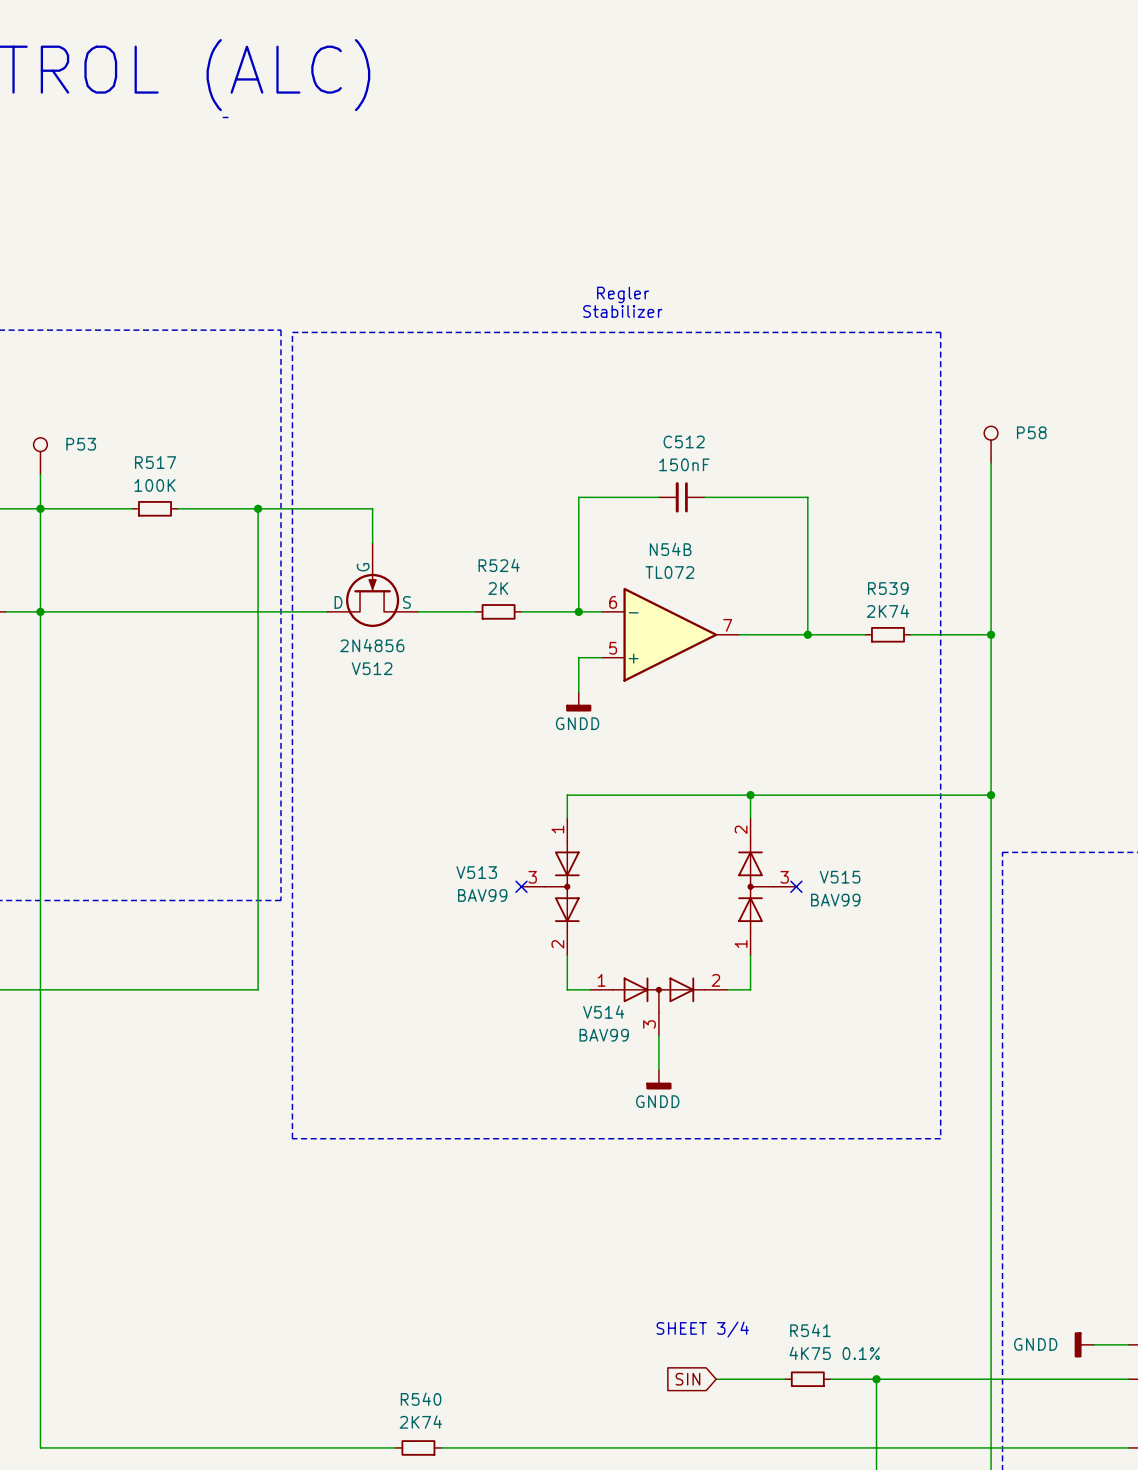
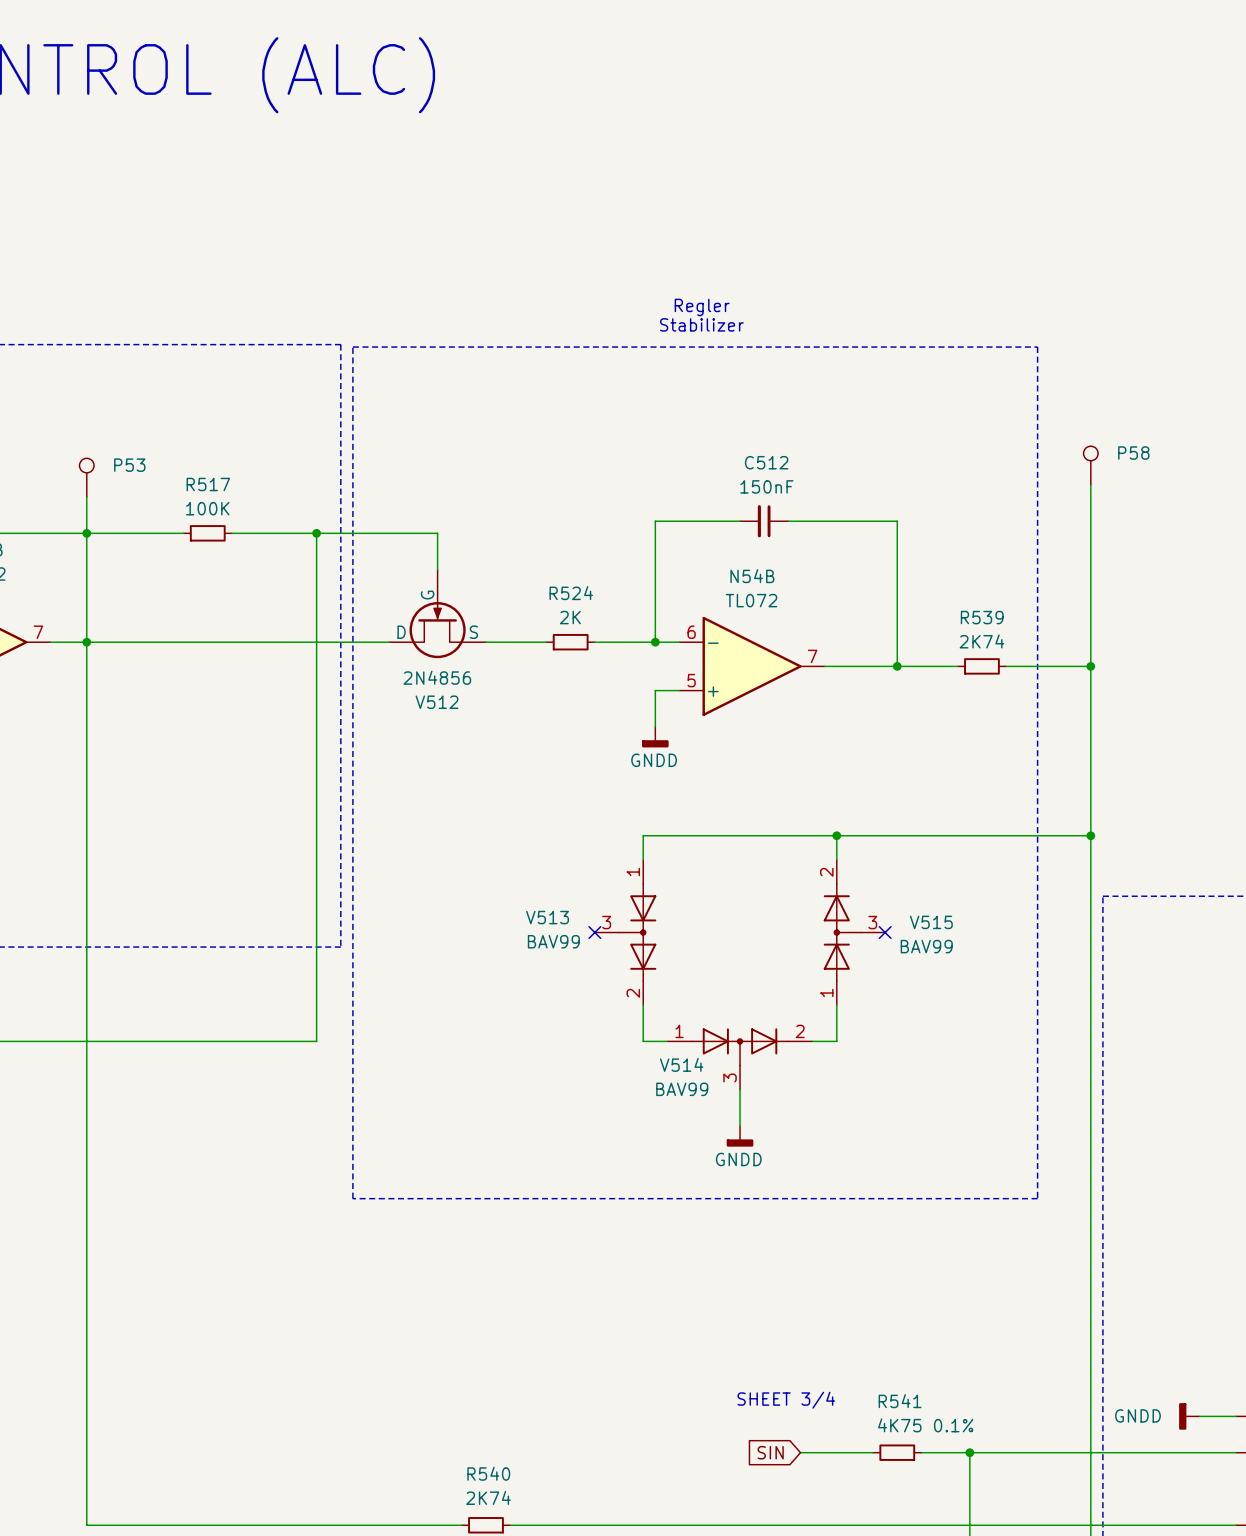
line: (223, 117) (227, 117) -> none

